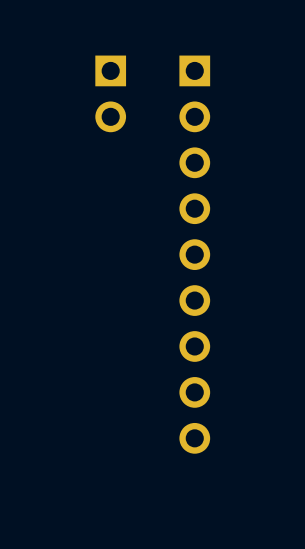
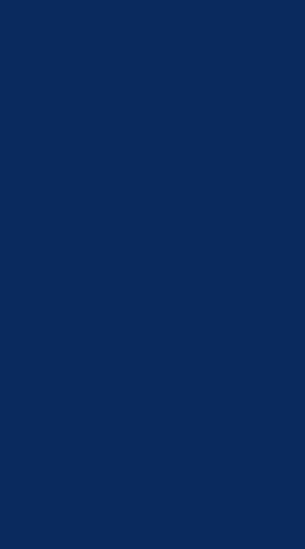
part: (110, 93) -> none
part: (194, 254) -> none

